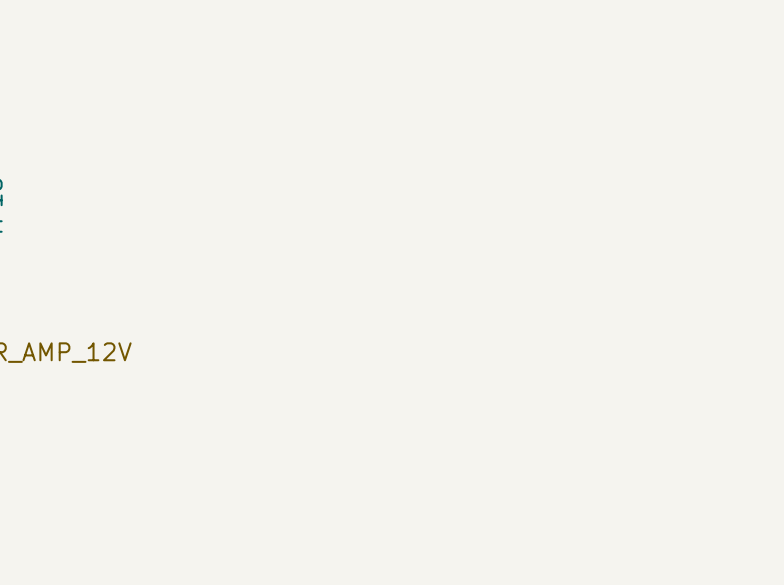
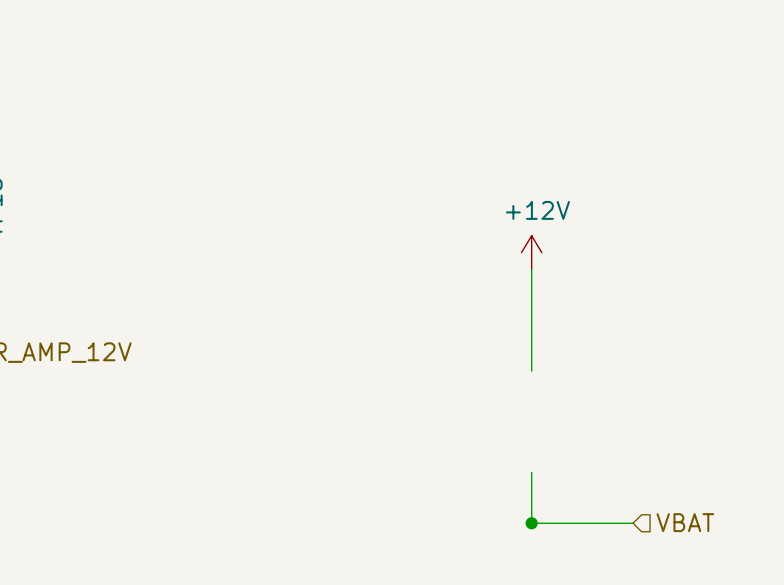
power symbol: none -> +12V (531, 252)
wire: none -> (531, 269) (531, 371)
wire: none -> (531, 472) (531, 523) (633, 523)
hierarchical label: none -> VBAT (685, 522)
junction: none -> (531, 523)

